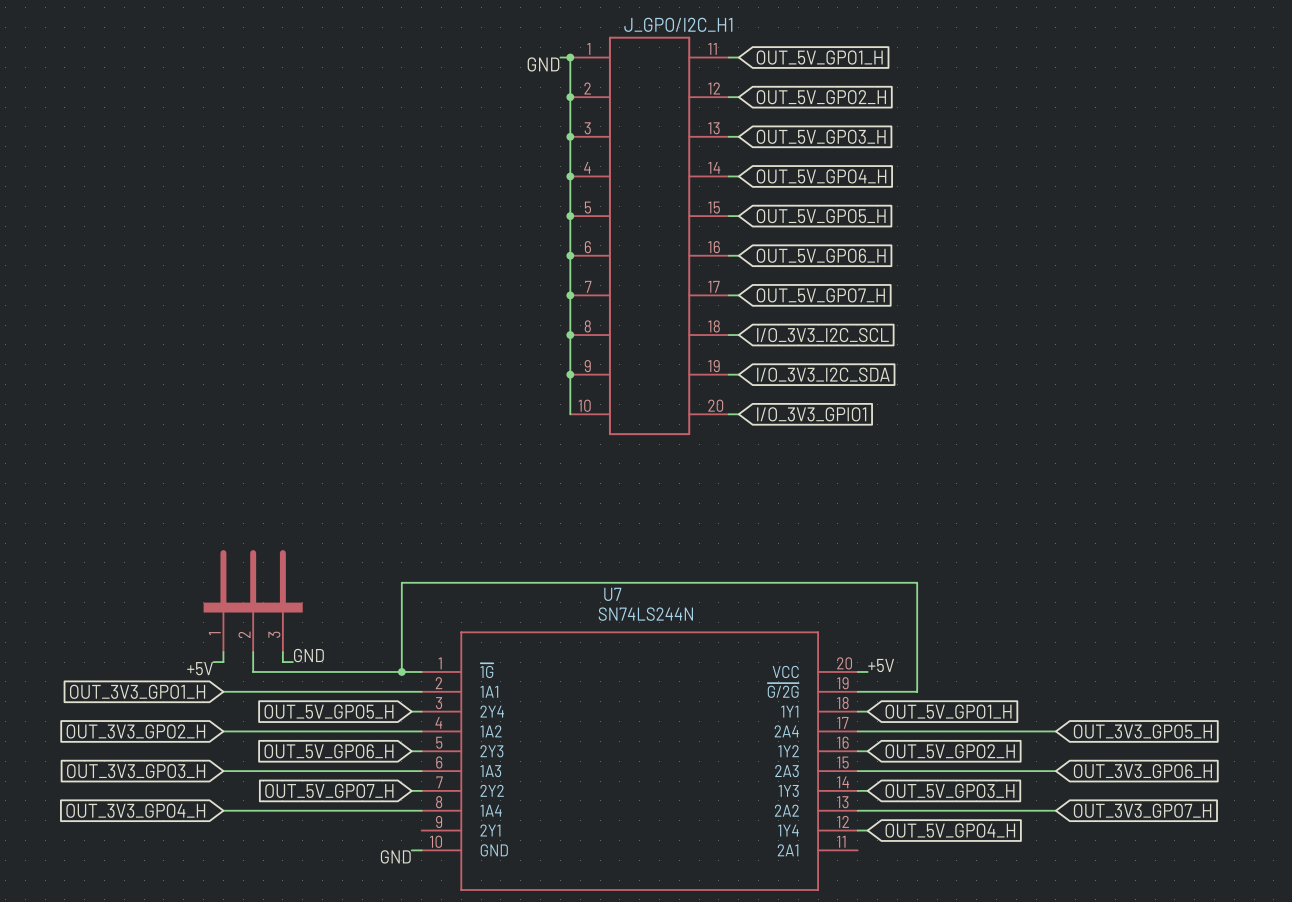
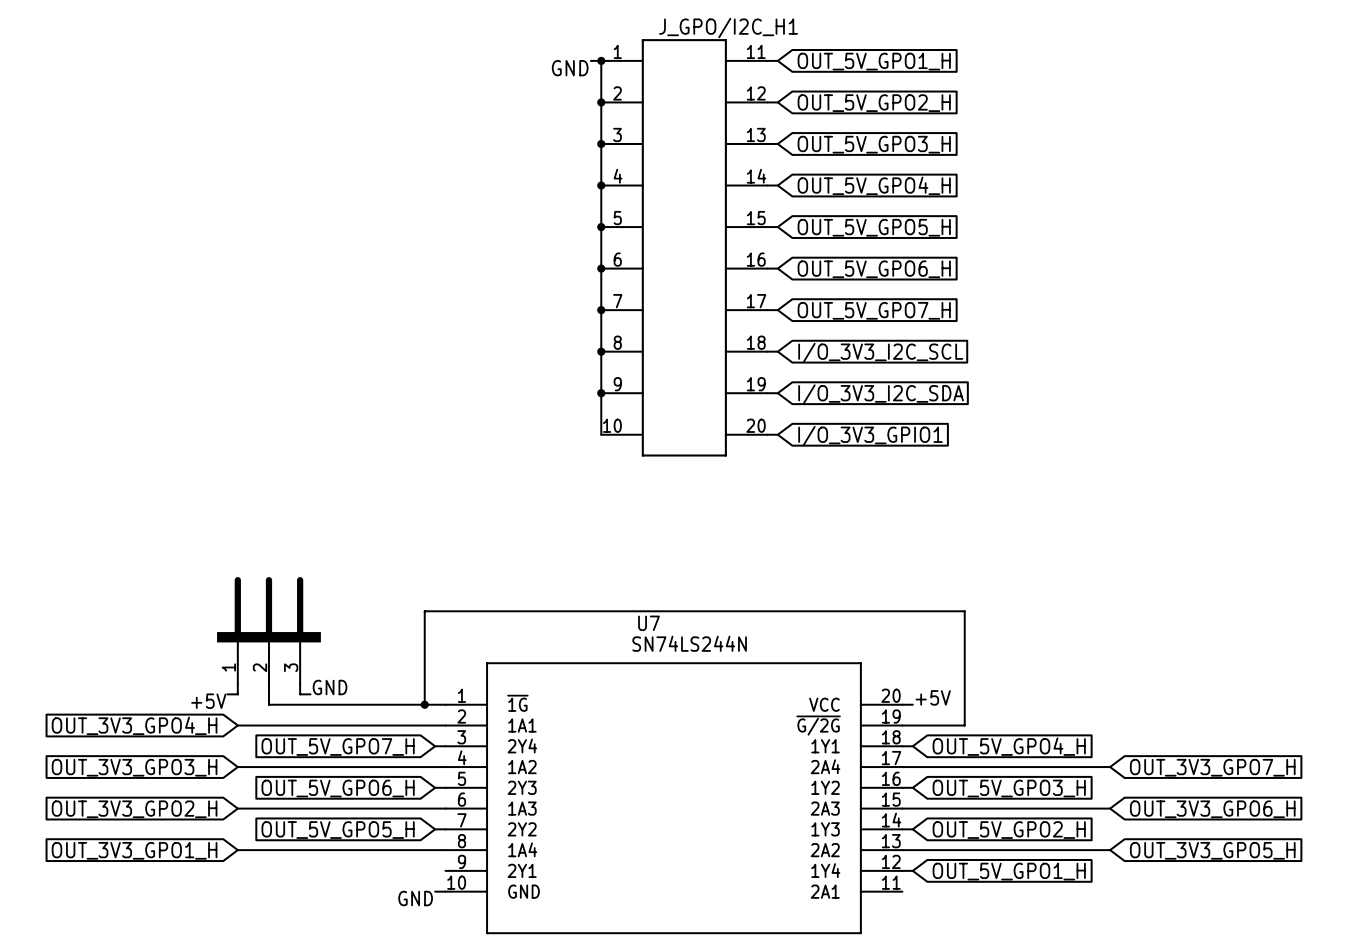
global label: OUT_3V3_GPO1_H (137, 691) -> OUT_3V3_GPO4_H (134, 725)
global label: OUT_5V_GPO5_H (329, 711) -> OUT_5V_GPO7_H (338, 746)
global label: OUT_5V_GPO1_H (948, 711) -> OUT_5V_GPO4_H (1009, 746)
global label: OUT_3V3_GPO2_H (135, 731) -> OUT_3V3_GPO3_H (134, 767)
global label: OUT_3V3_GPO5_H (1142, 731) -> OUT_3V3_GPO7_H (1212, 767)
global label: OUT_5V_GPO2_H (950, 751) -> OUT_5V_GPO3_H (1009, 788)
global label: OUT_3V3_GPO3_H (136, 771) -> OUT_3V3_GPO2_H (134, 809)
global label: OUT_5V_GPO7_H (329, 790) -> OUT_5V_GPO5_H (338, 830)
global label: OUT_5V_GPO3_H (950, 790) -> OUT_5V_GPO2_H (1009, 830)
global label: OUT_3V3_GPO4_H (135, 810) -> OUT_3V3_GPO1_H (134, 850)
global label: OUT_3V3_GPO7_H (1142, 810) -> OUT_3V3_GPO5_H (1212, 850)
global label: OUT_5V_GPO4_H (950, 830) -> OUT_5V_GPO1_H (1009, 871)

